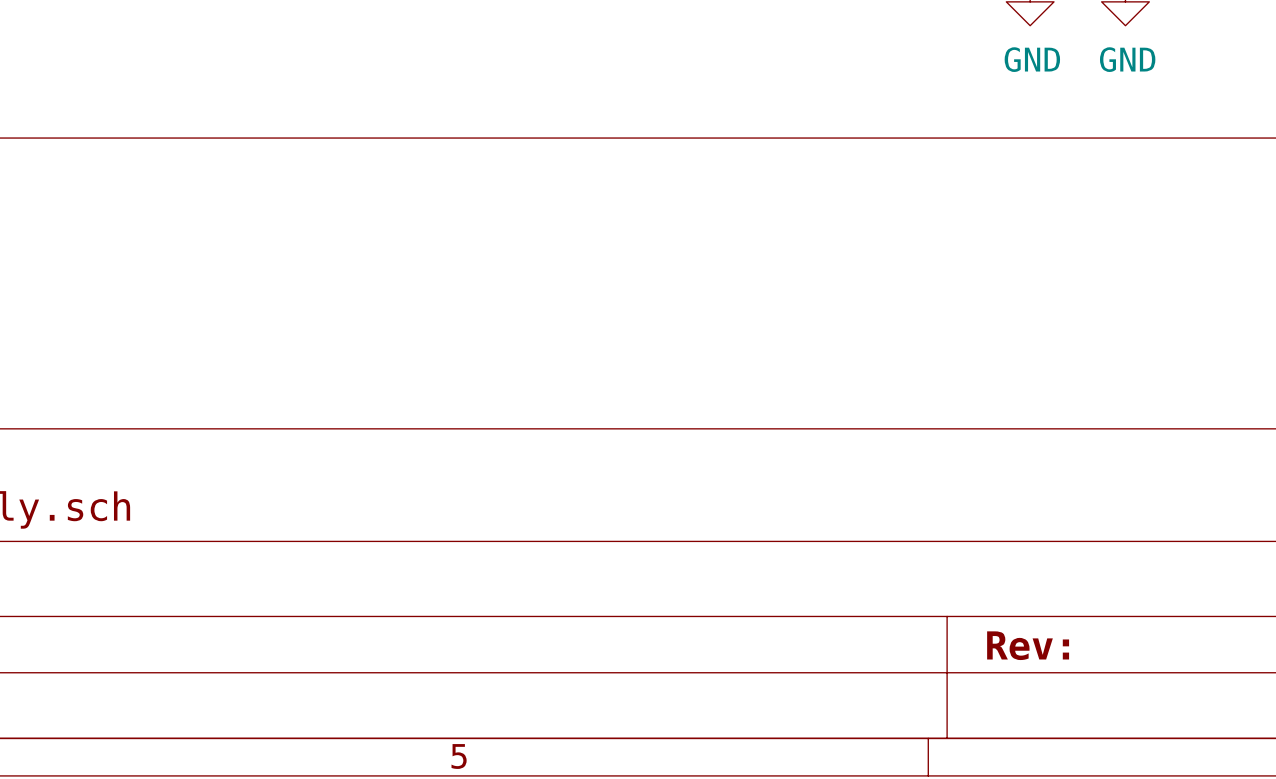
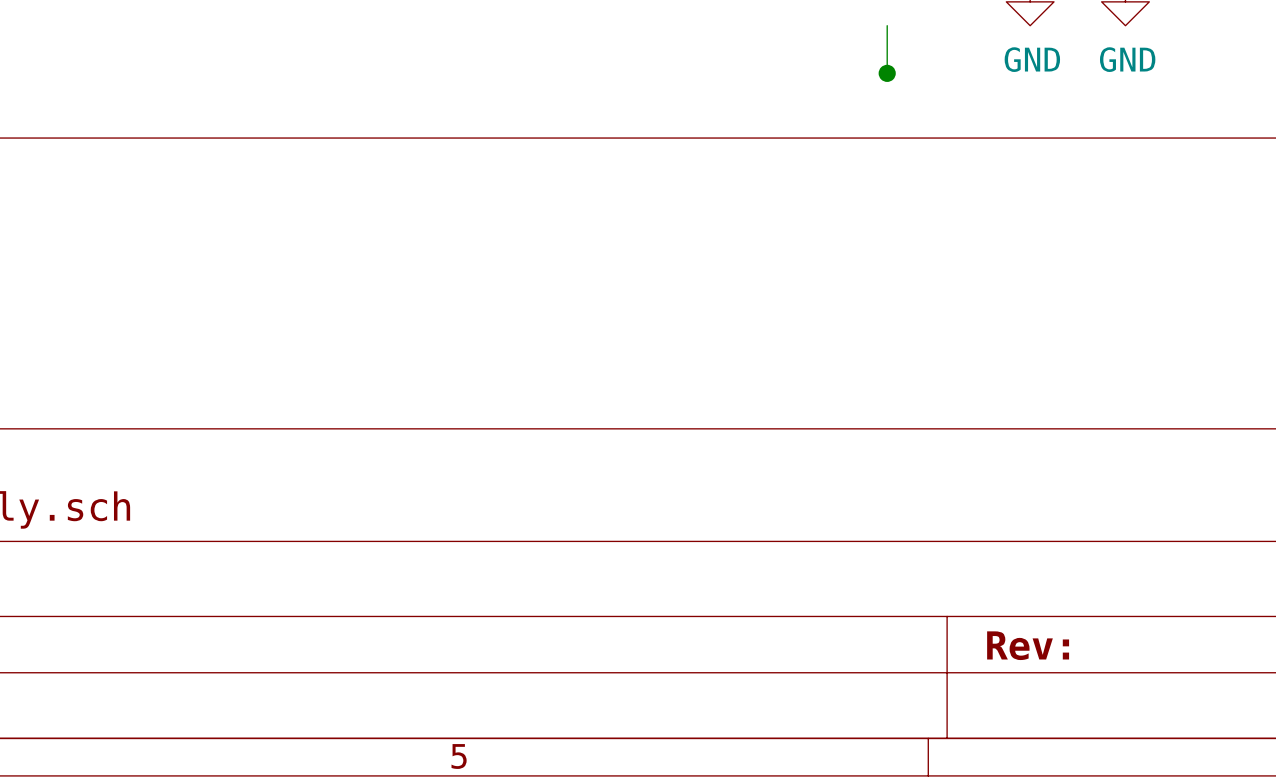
wire: none -> (887, 25) (887, 73)
junction: none -> (887, 73)

